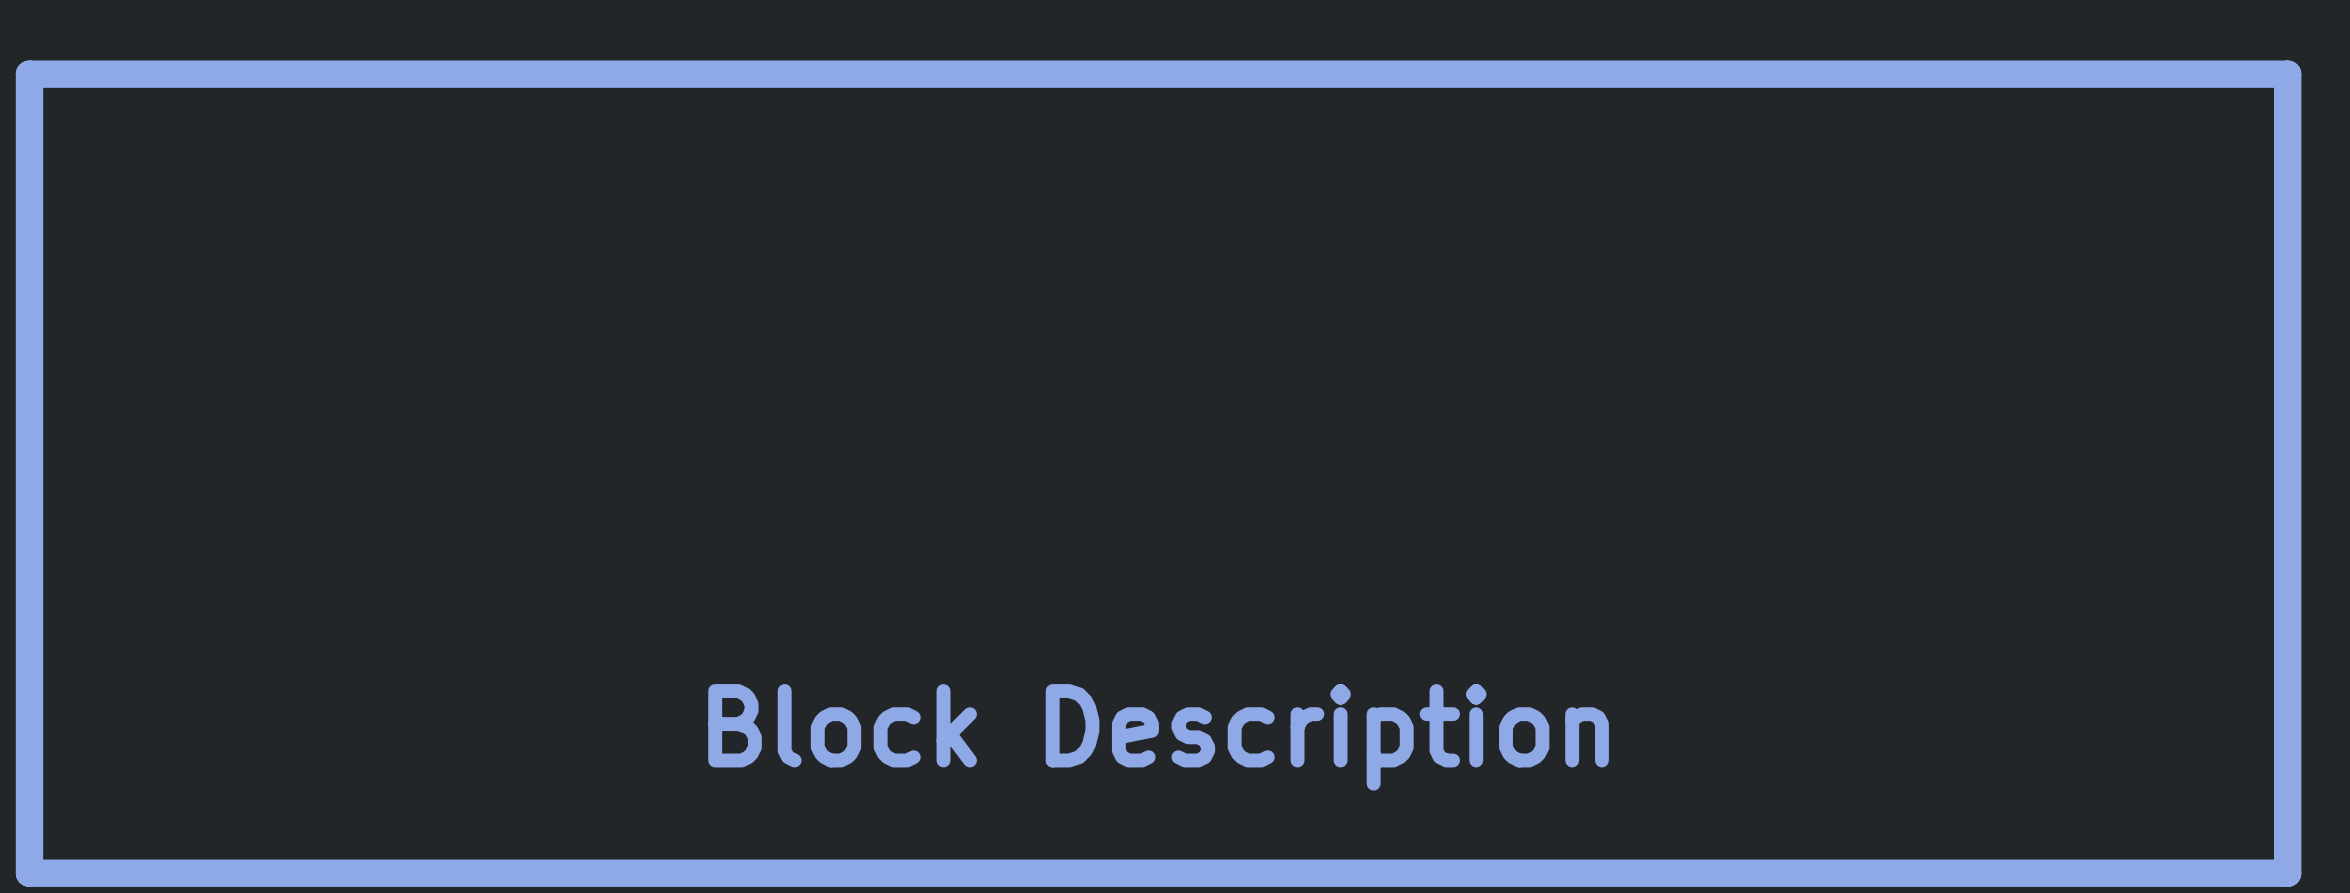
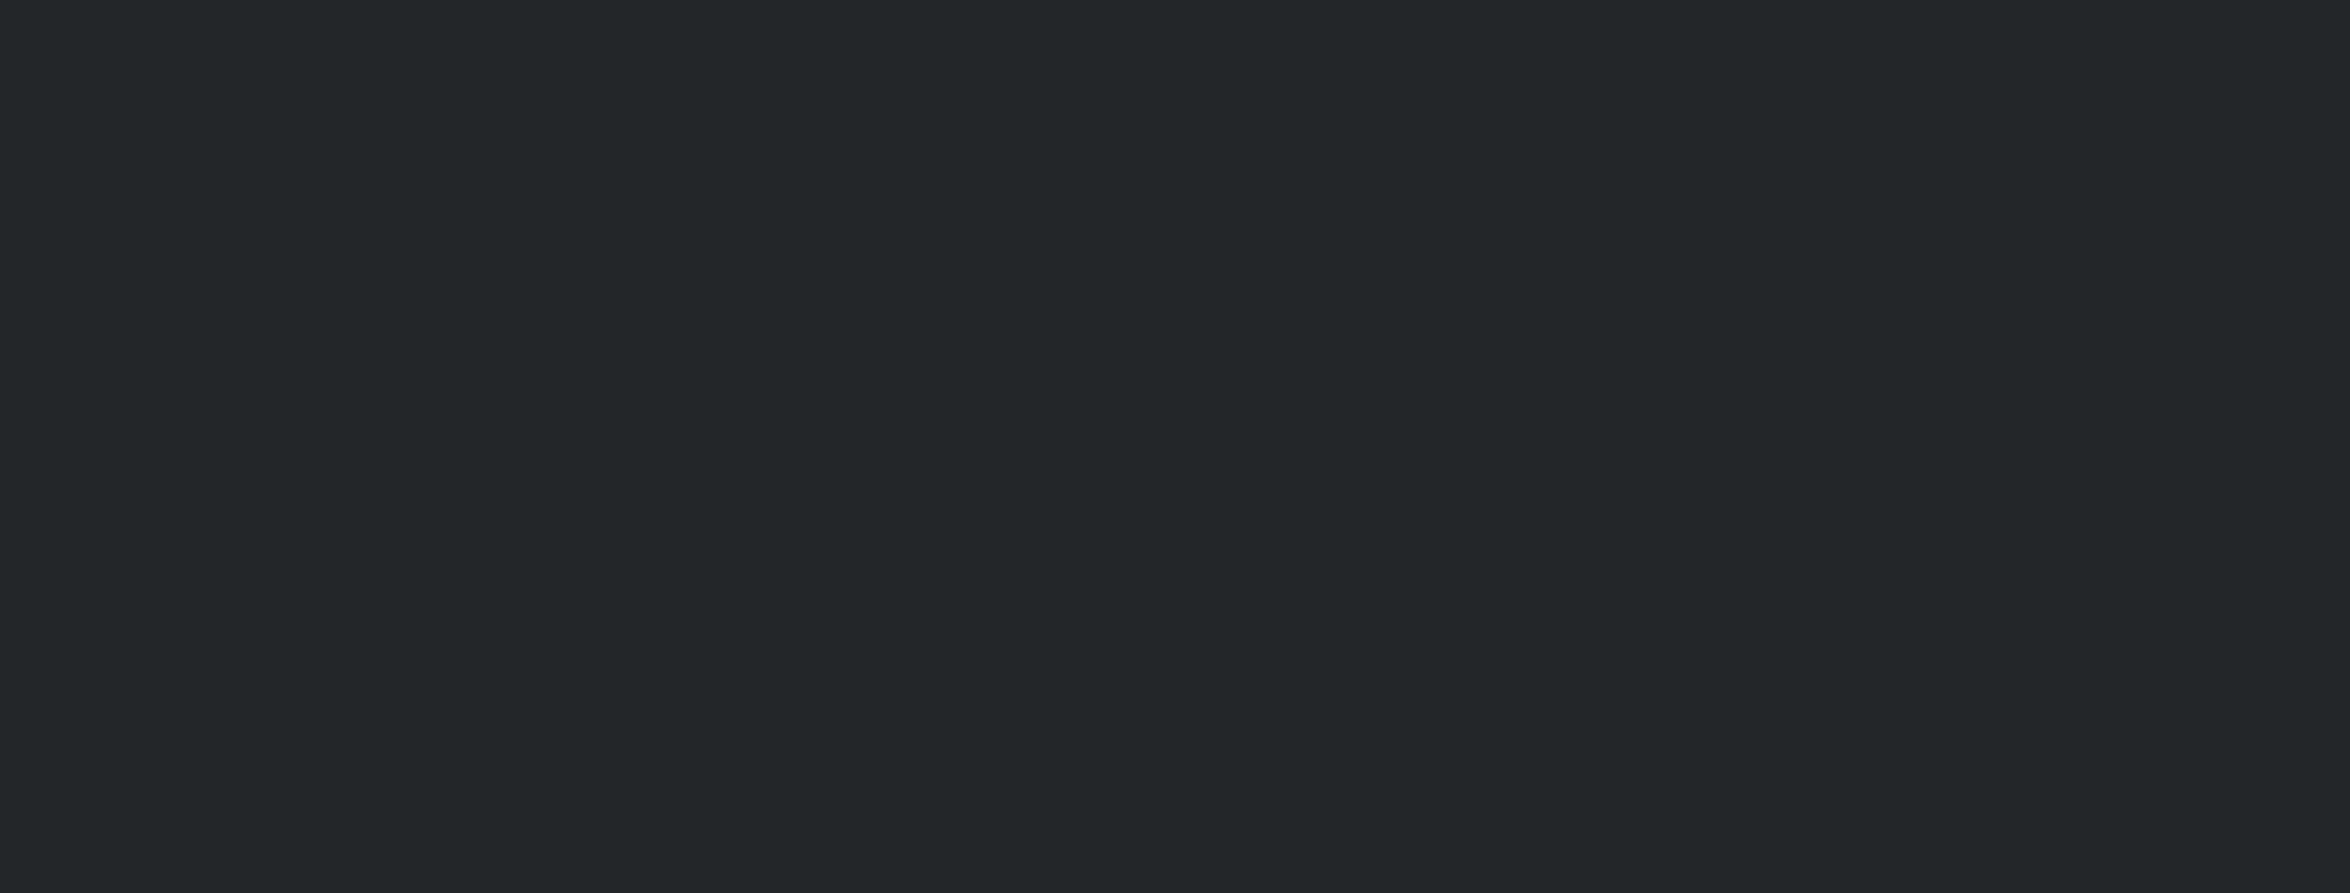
line: (29, 74) (2287, 74) (2287, 873) (29, 873) (29, 74) -> none
text: Block Description (1158, 737) -> none

